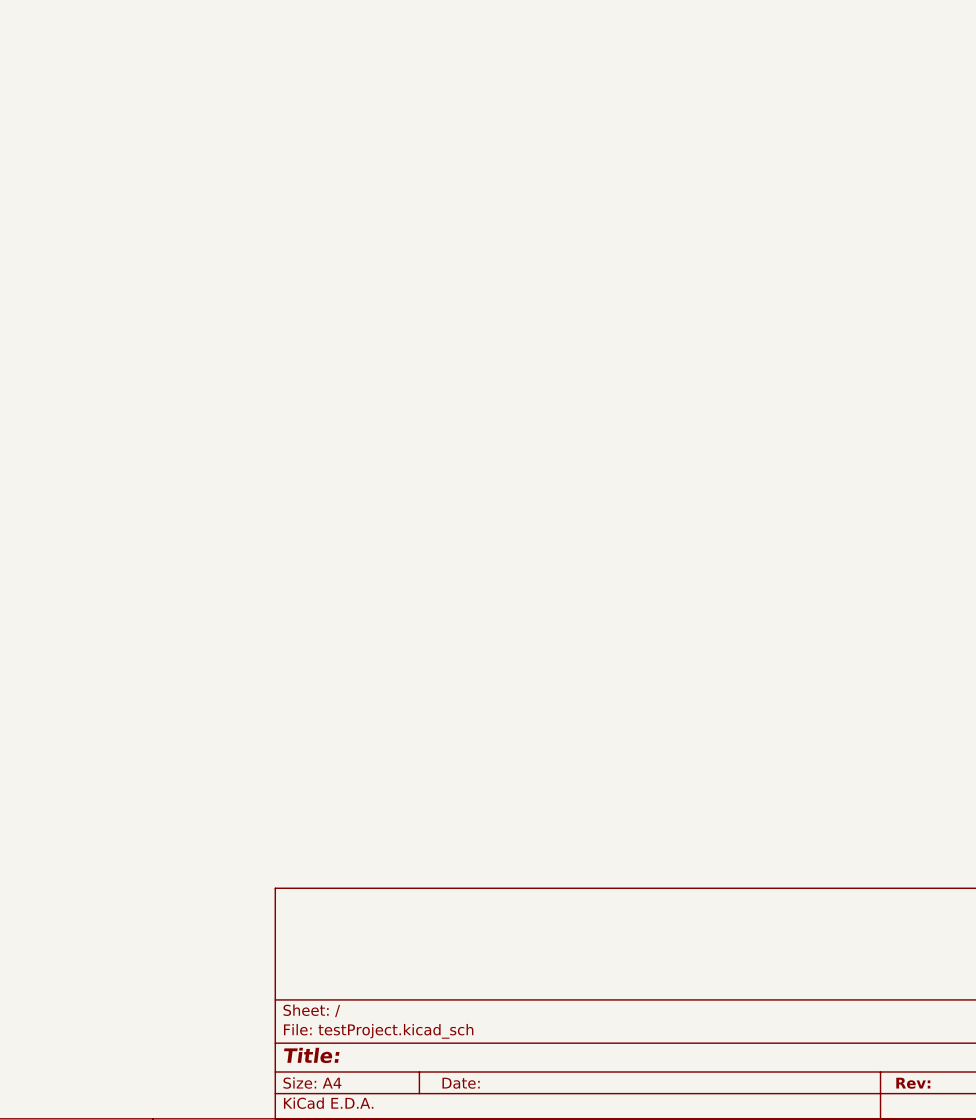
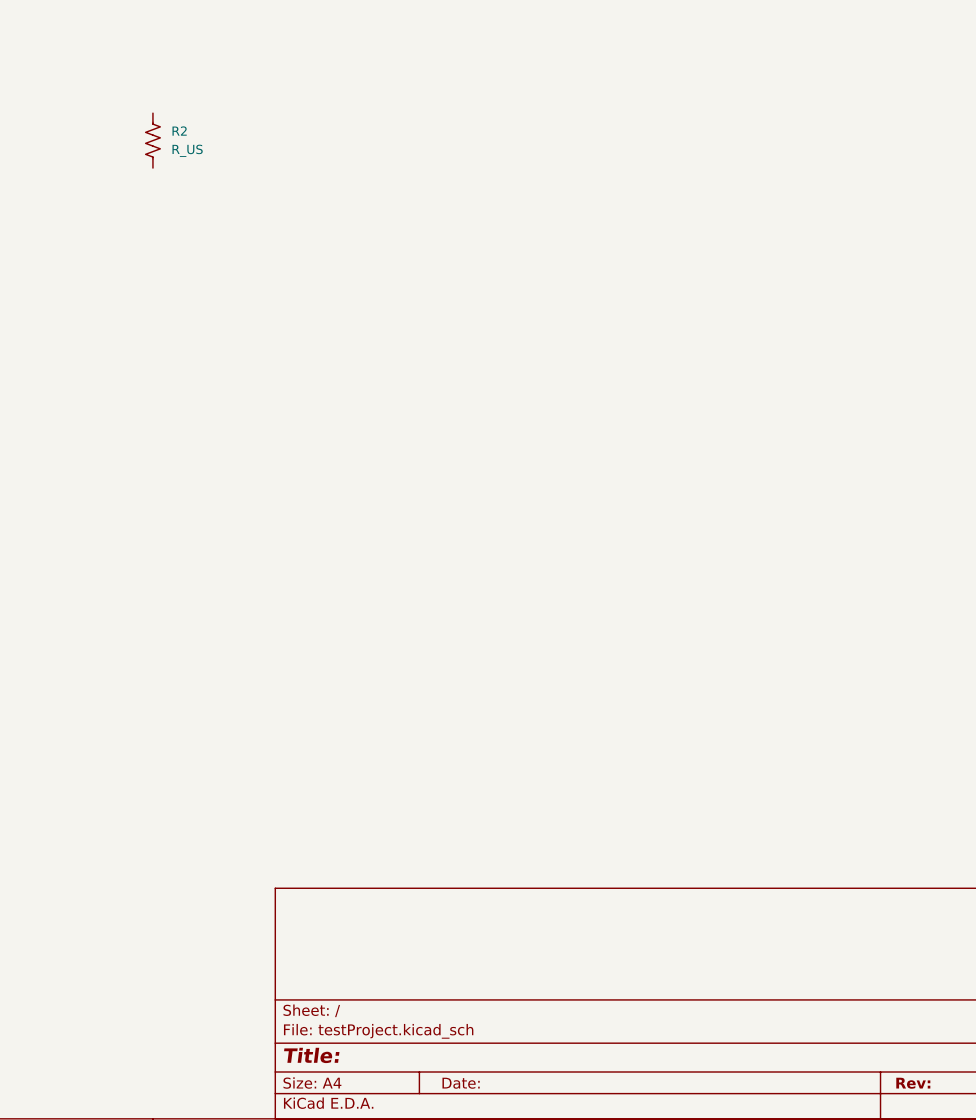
R2: none -> R_US (152, 140)

